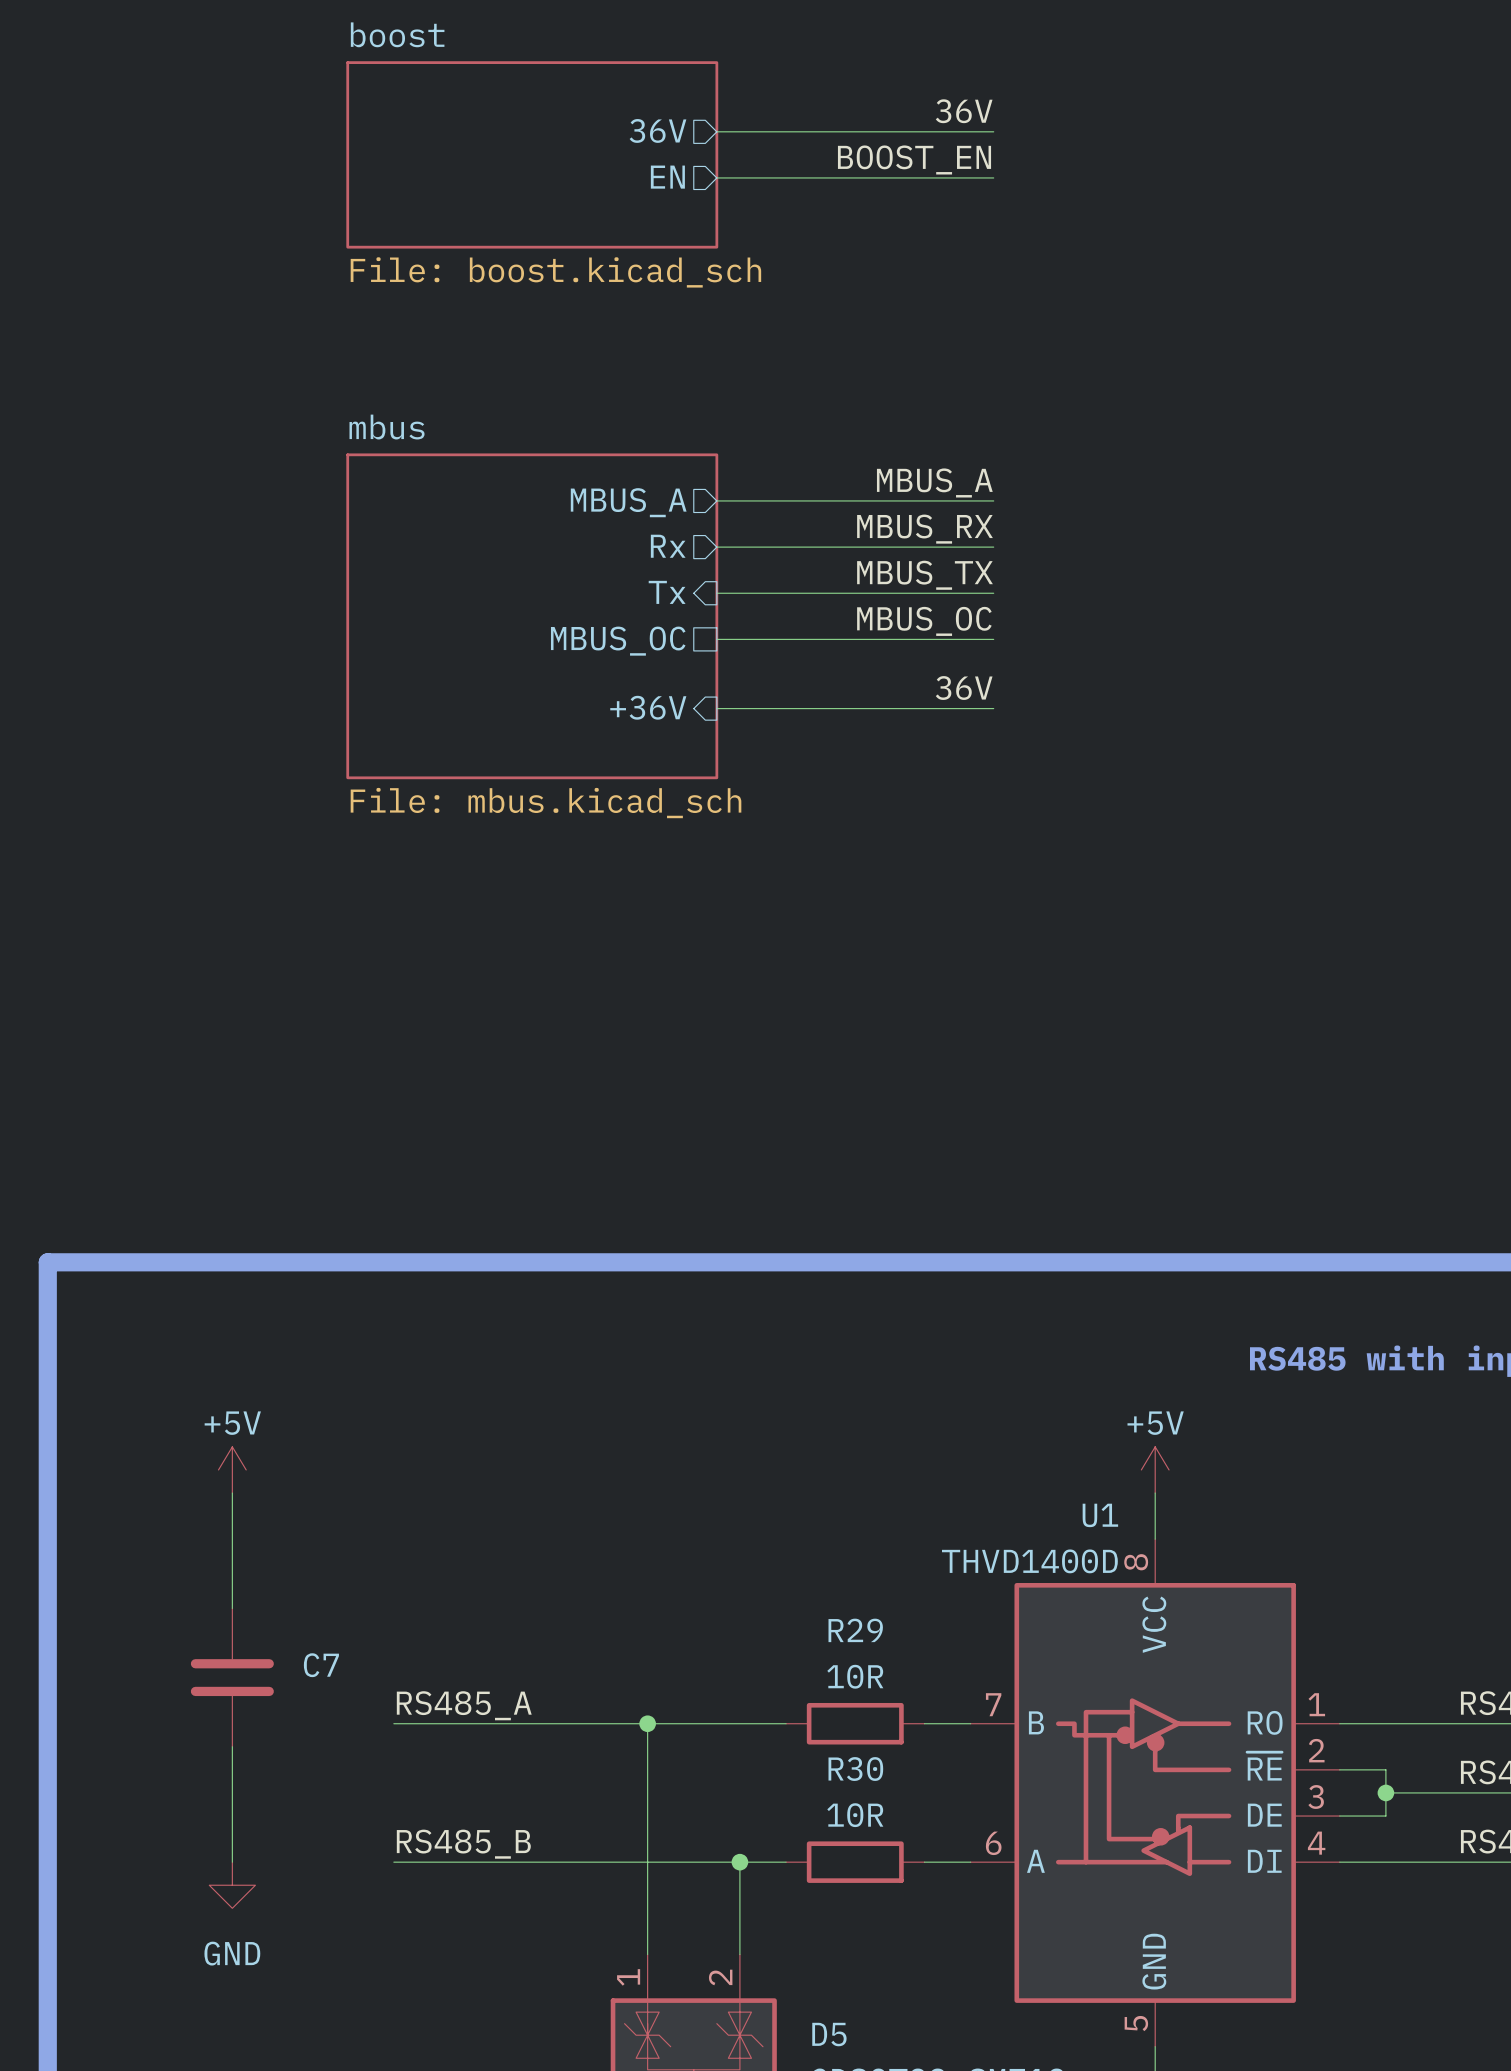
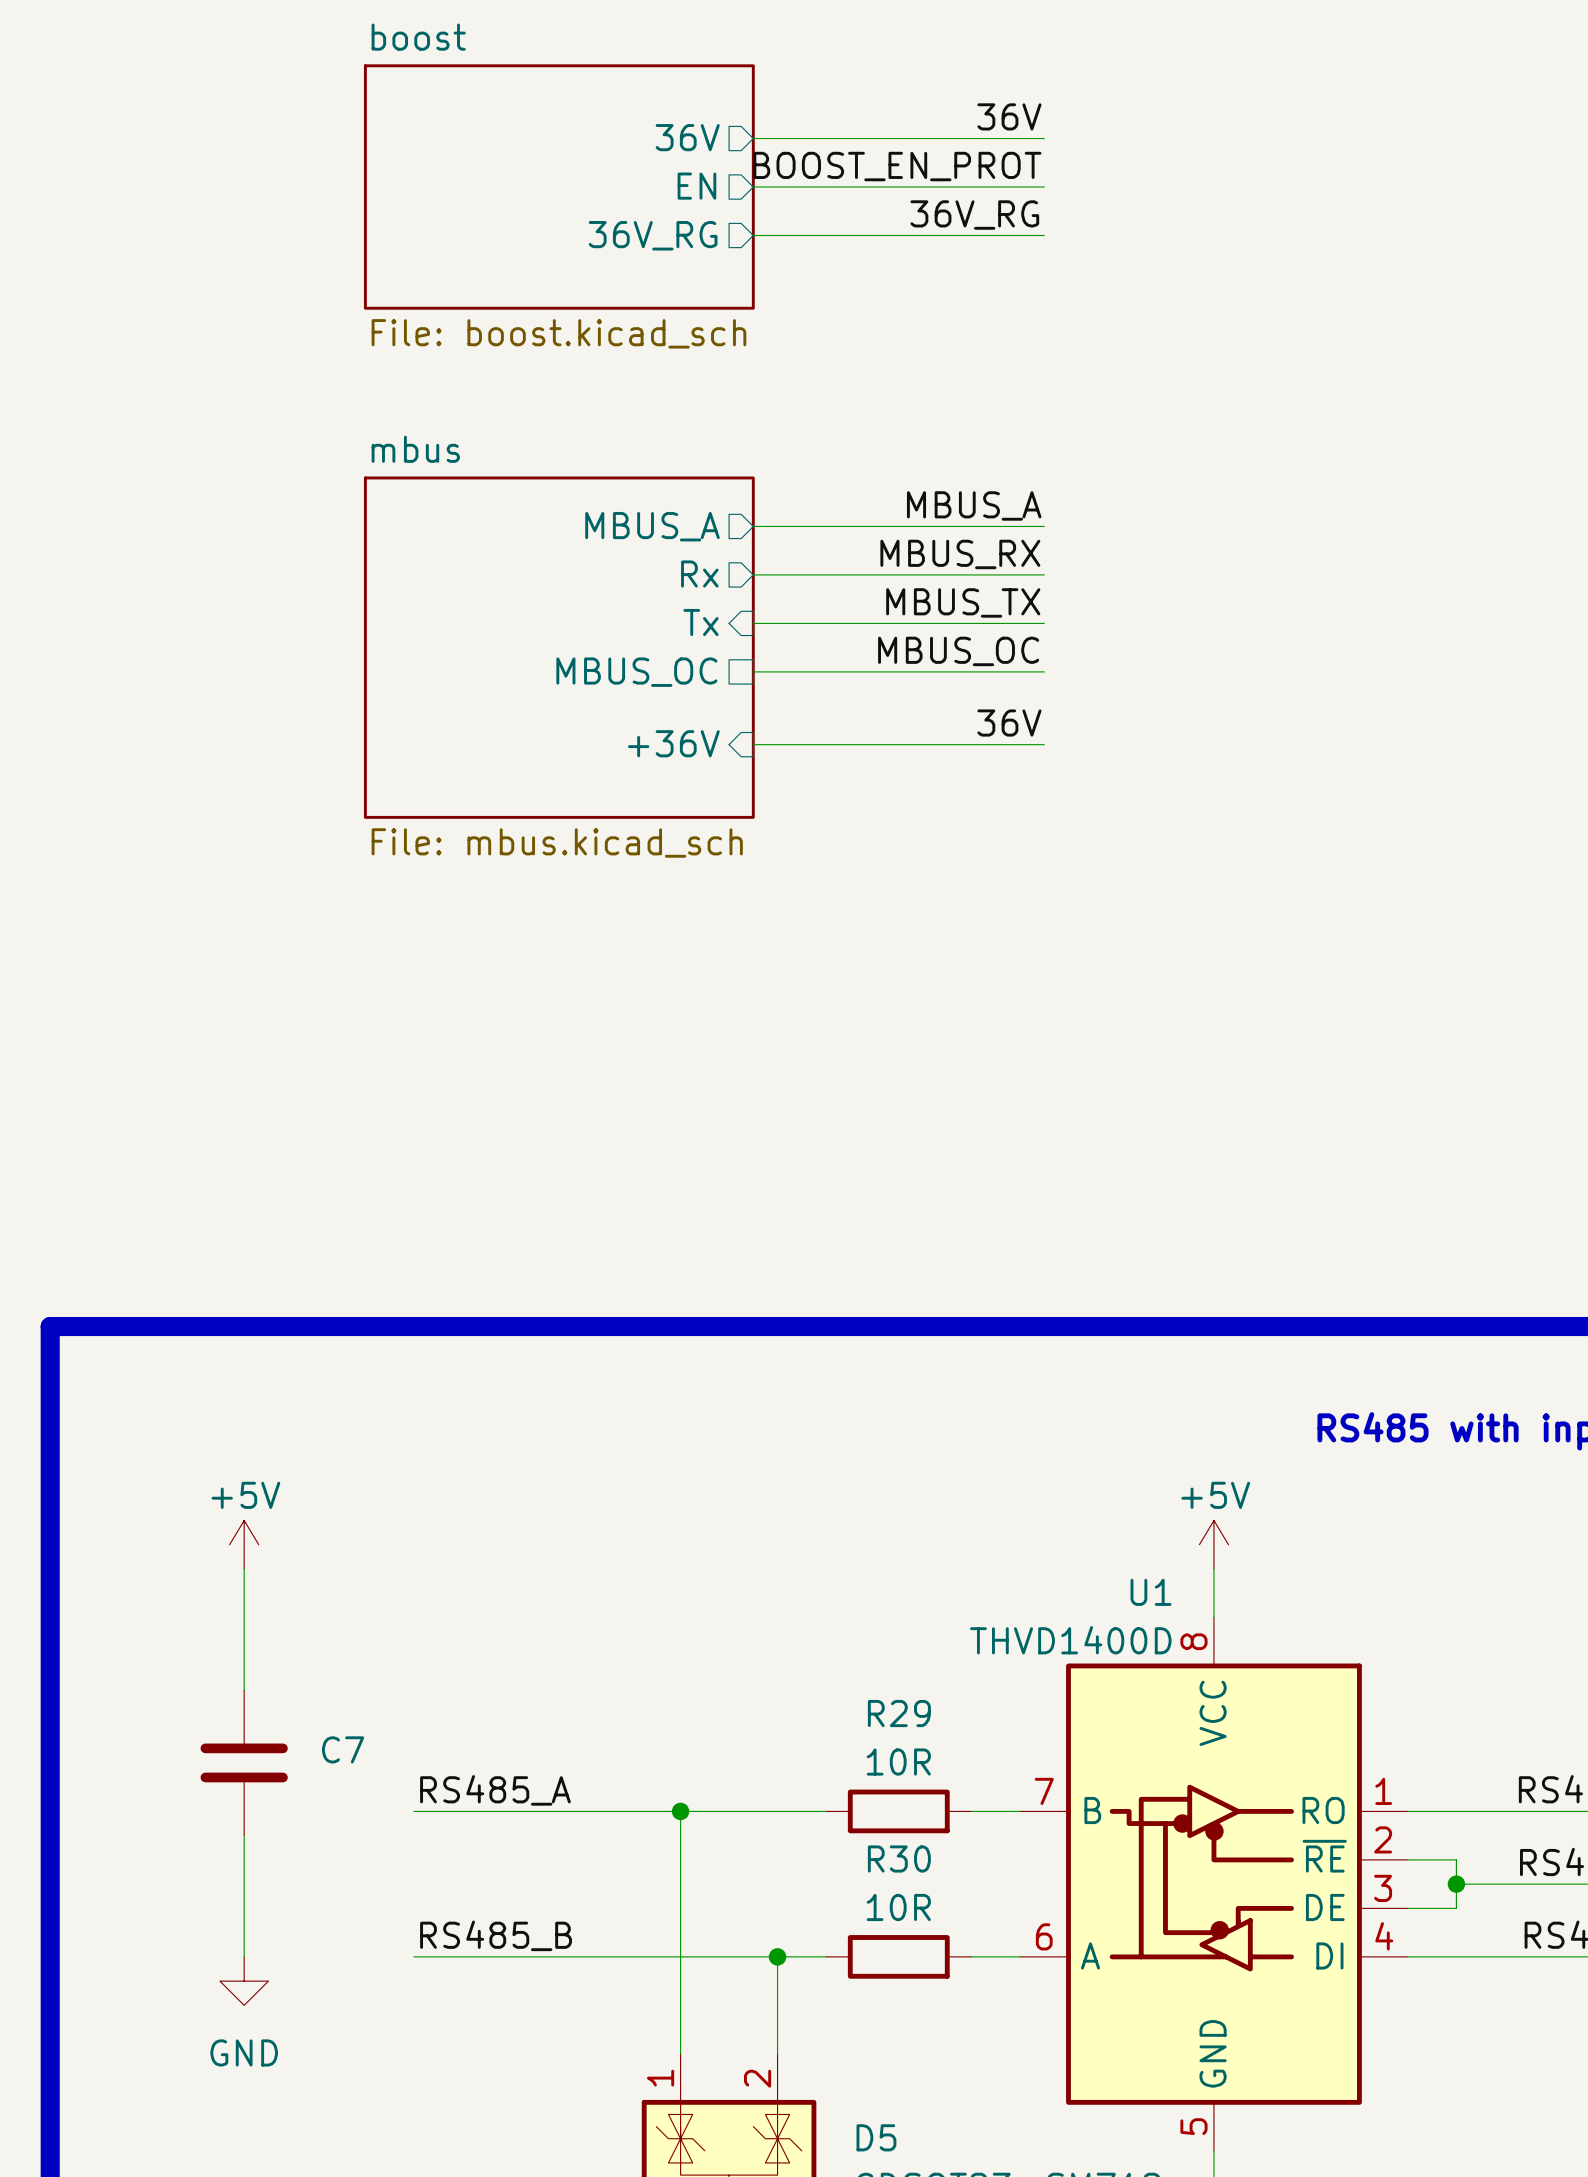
sheet boost: File: boost.kicad_sch (532, 154) -> none
label: BOOST_EN (914, 159) -> BOOST_EN_PROT (897, 166)
sheet boost: none -> File: boost.kicad_sch (559, 187)
label: none -> 36V_RG (974, 215)
wire: none -> (753, 235) (1044, 235)
sheet pin: none -> 36V_RG (653, 235)

